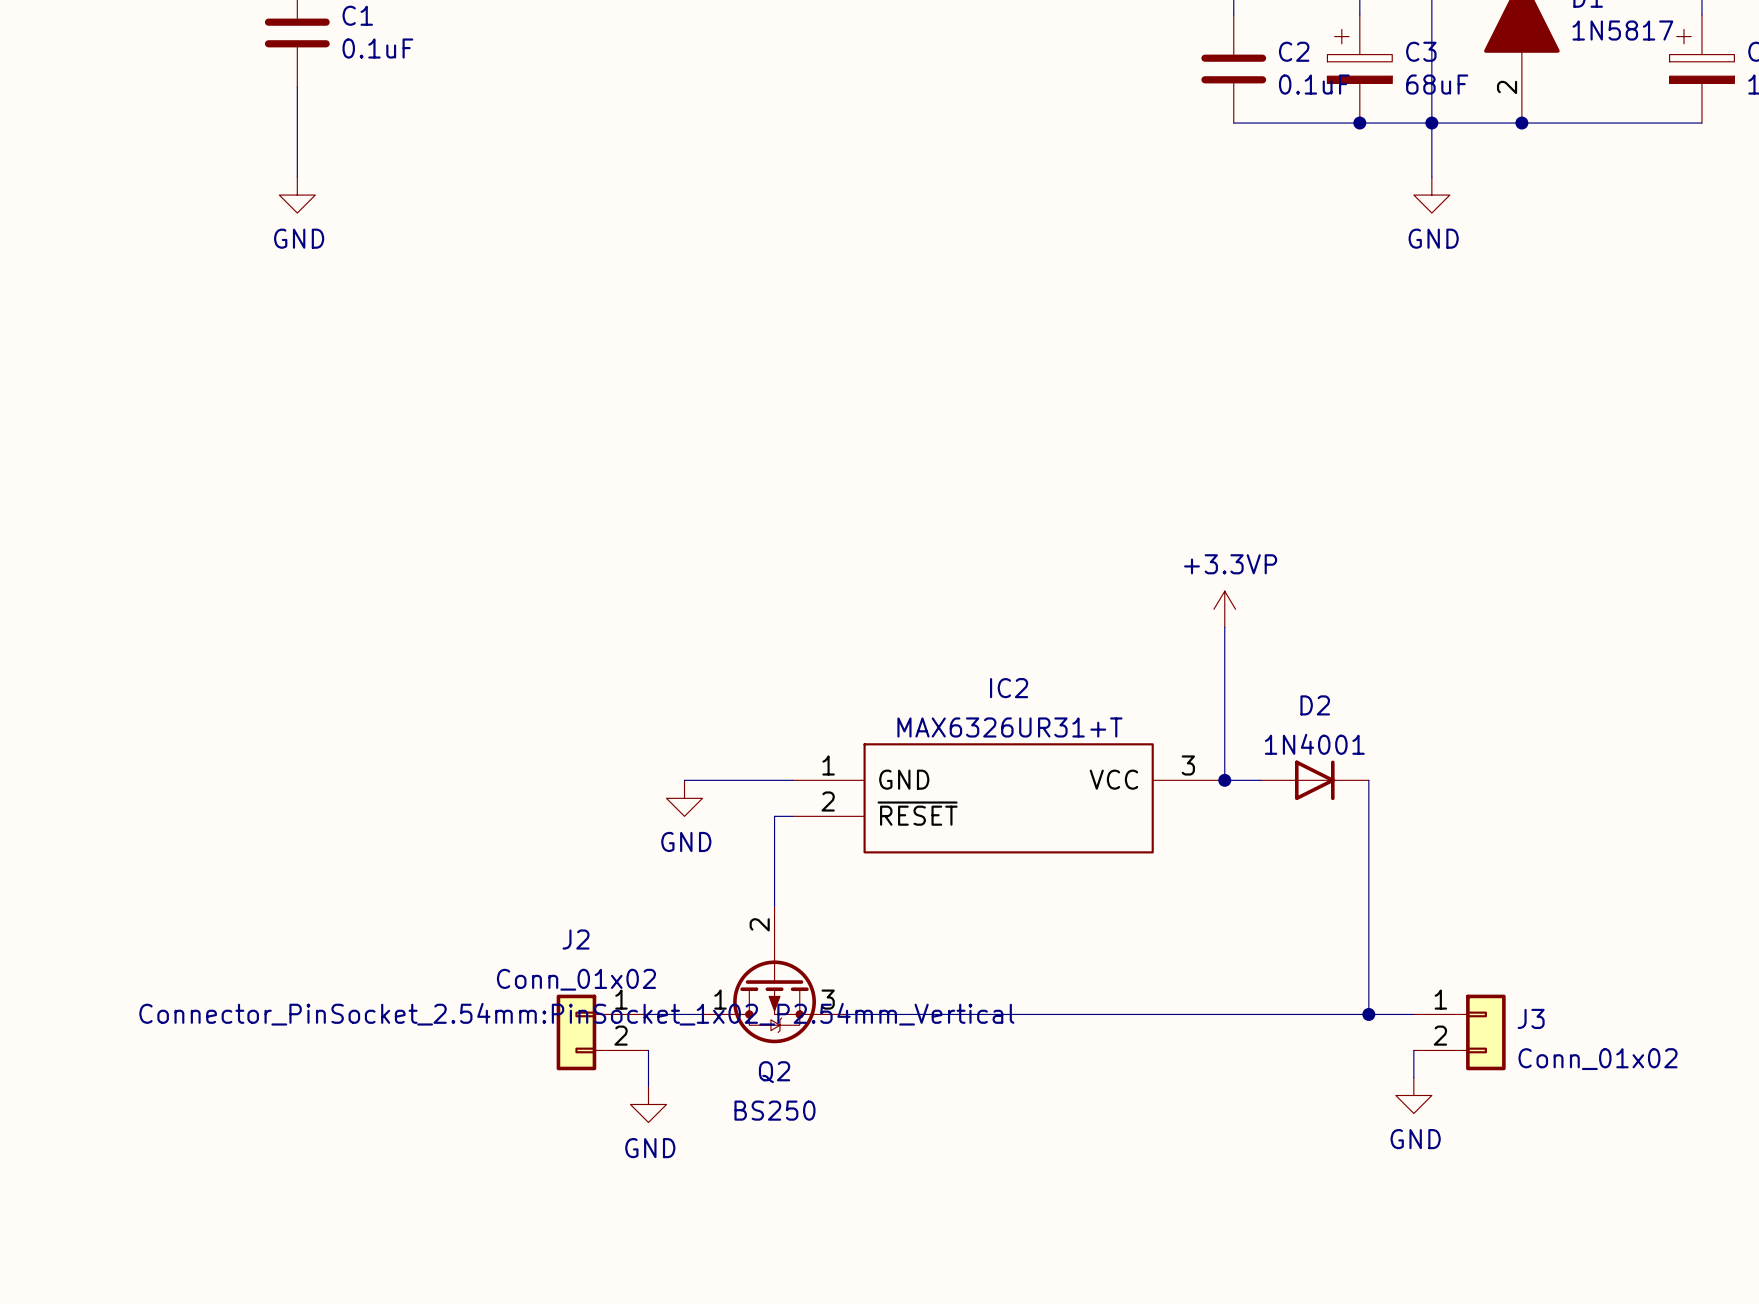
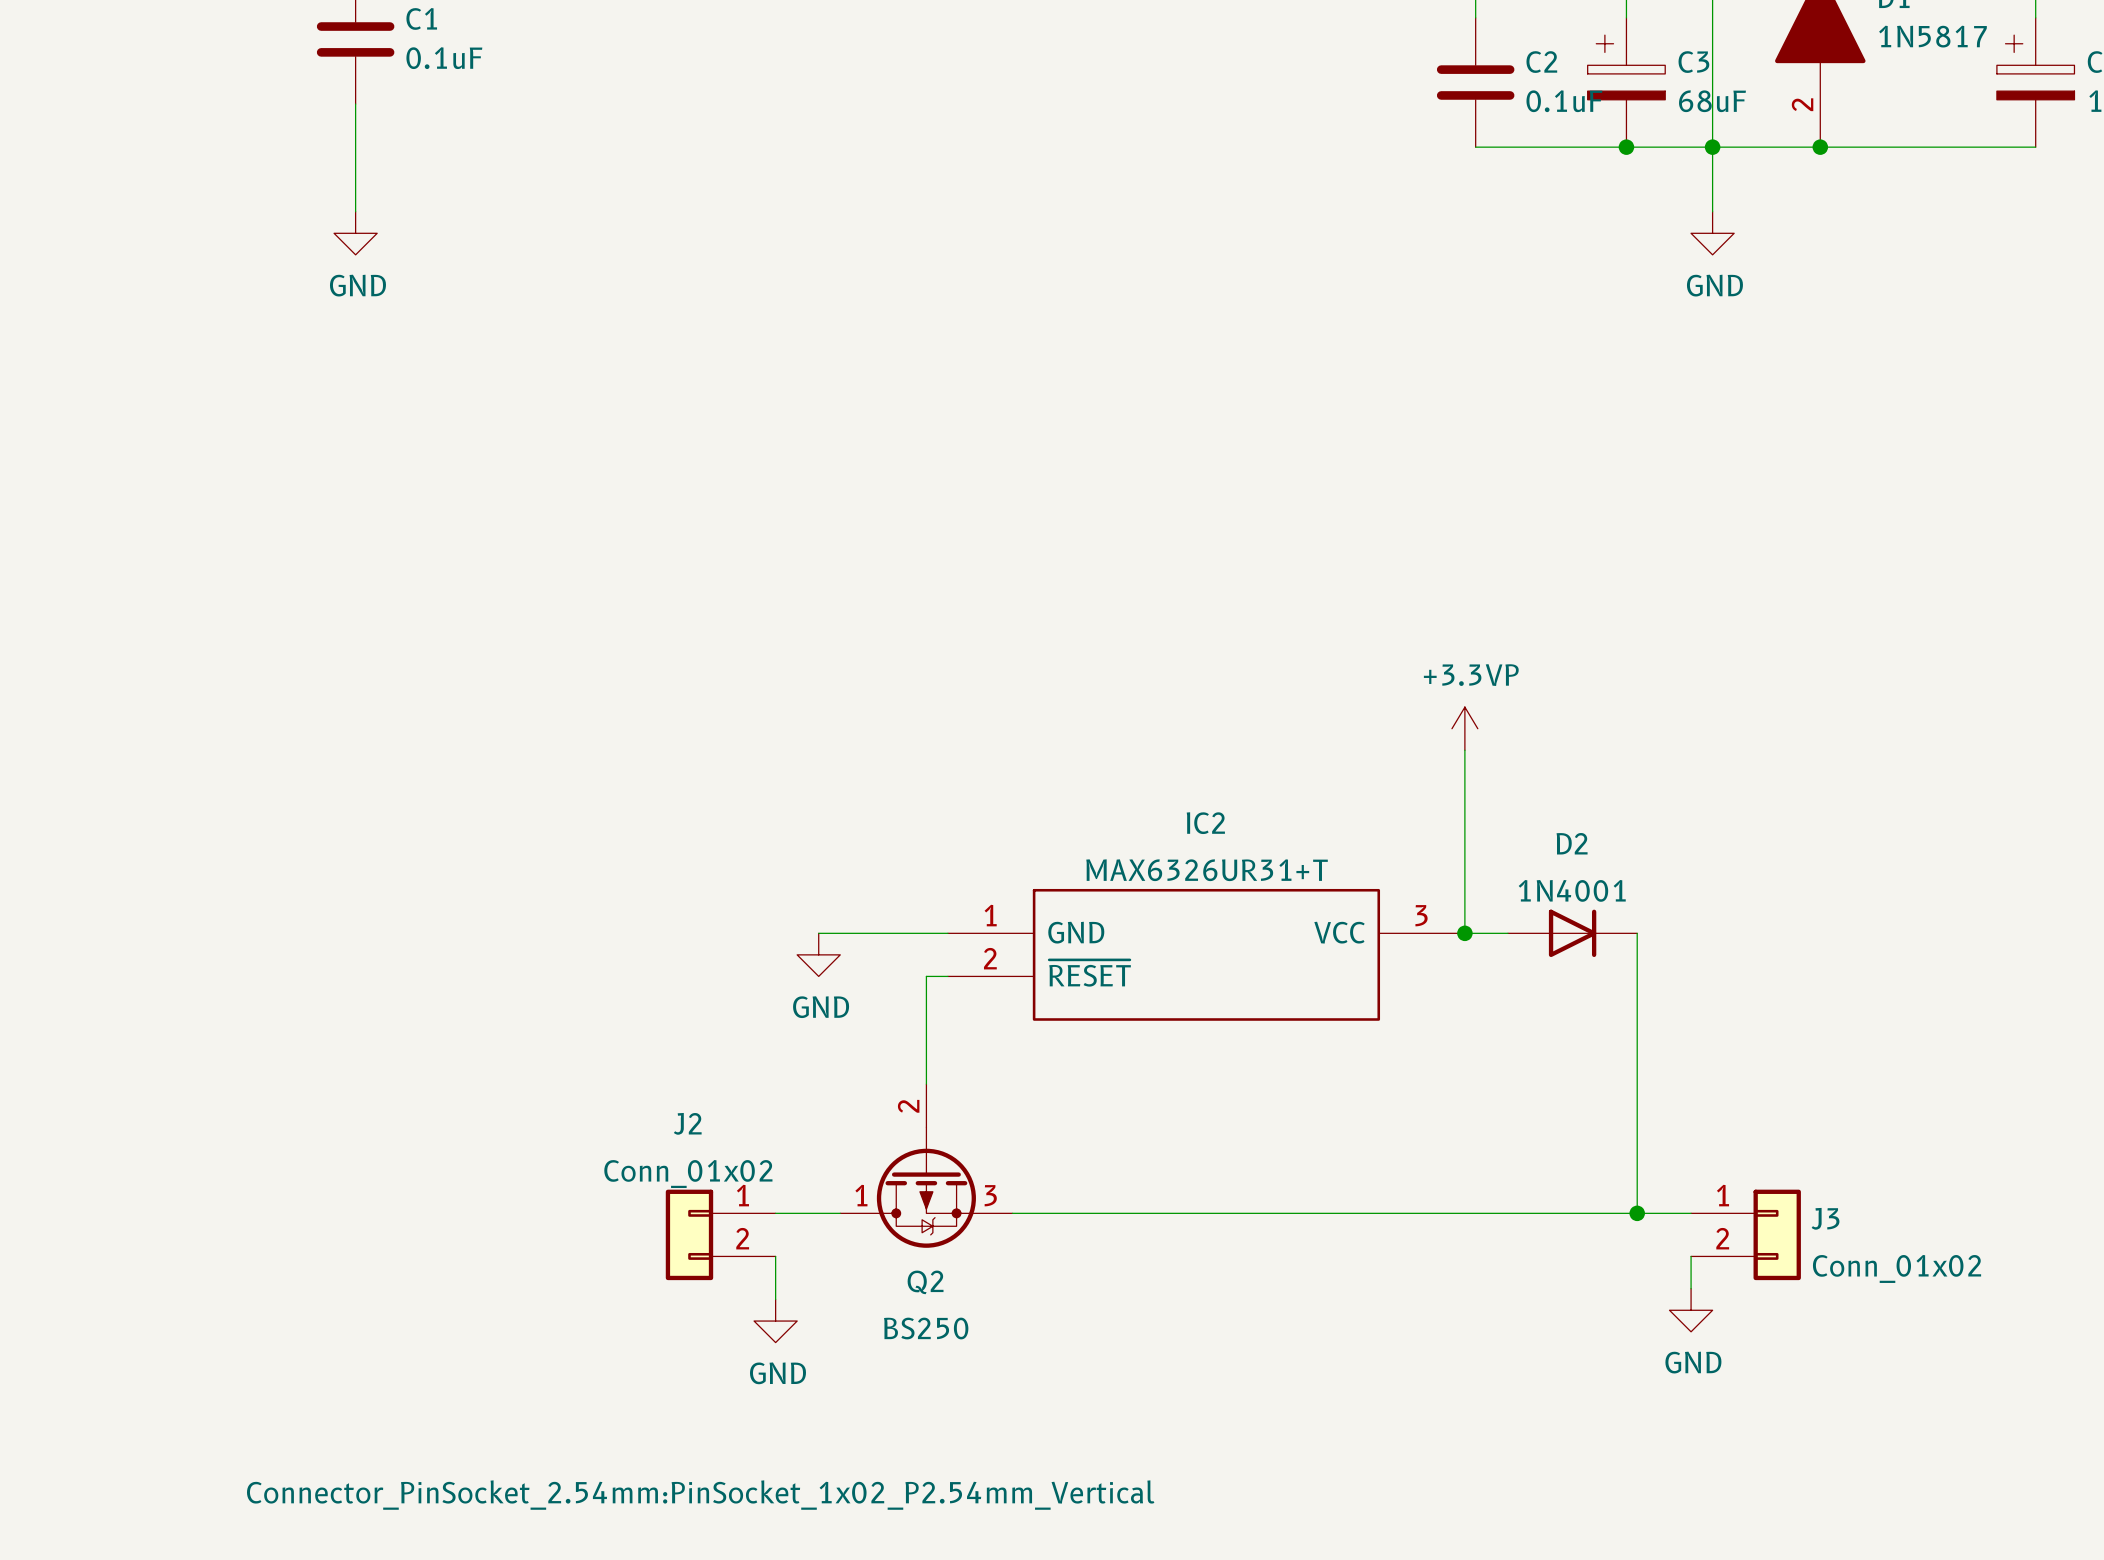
J2 text position: Connector_PinSocket_2.54mm:PinSocket_1x02_P2.54mm_Vertical (576, 1014) -> Connector_PinSocket_2.54mm:PinSocket_1x02_P2.54mm_Vertical (700, 1495)

